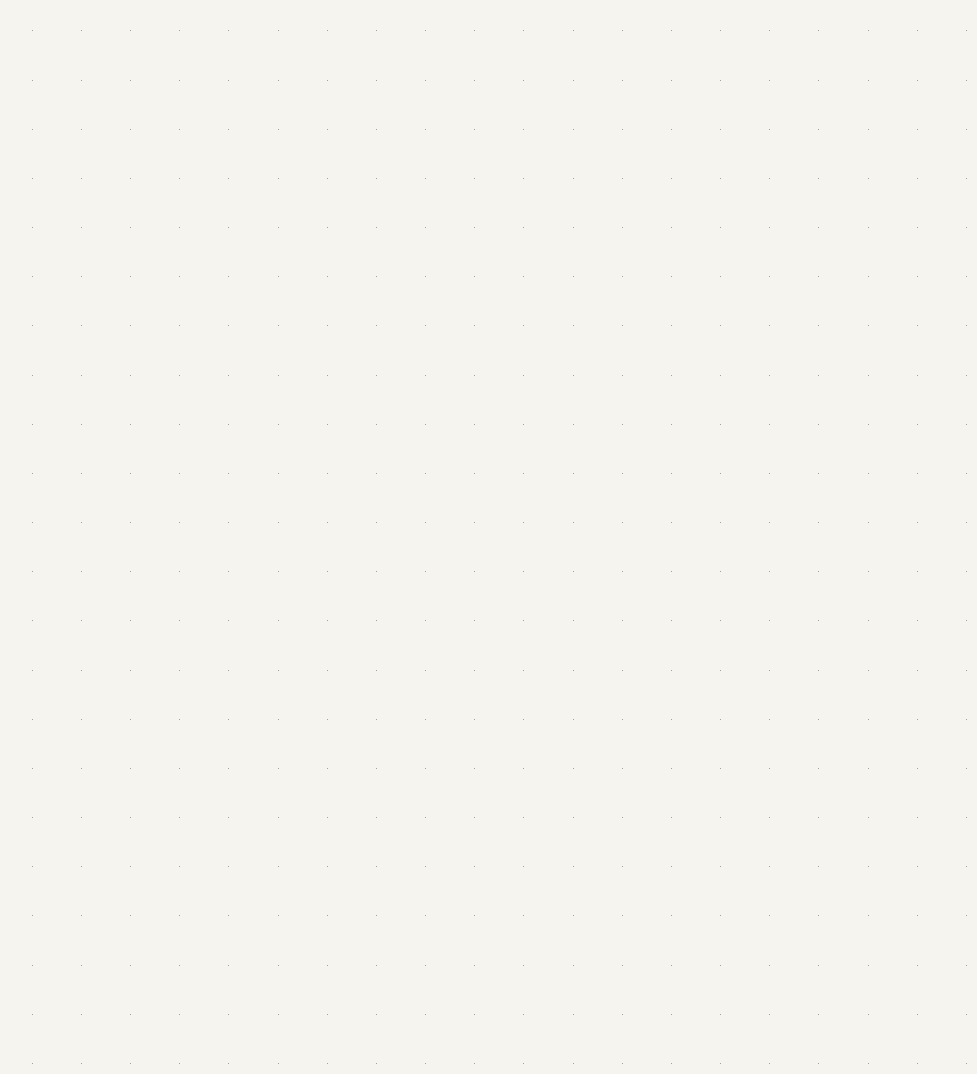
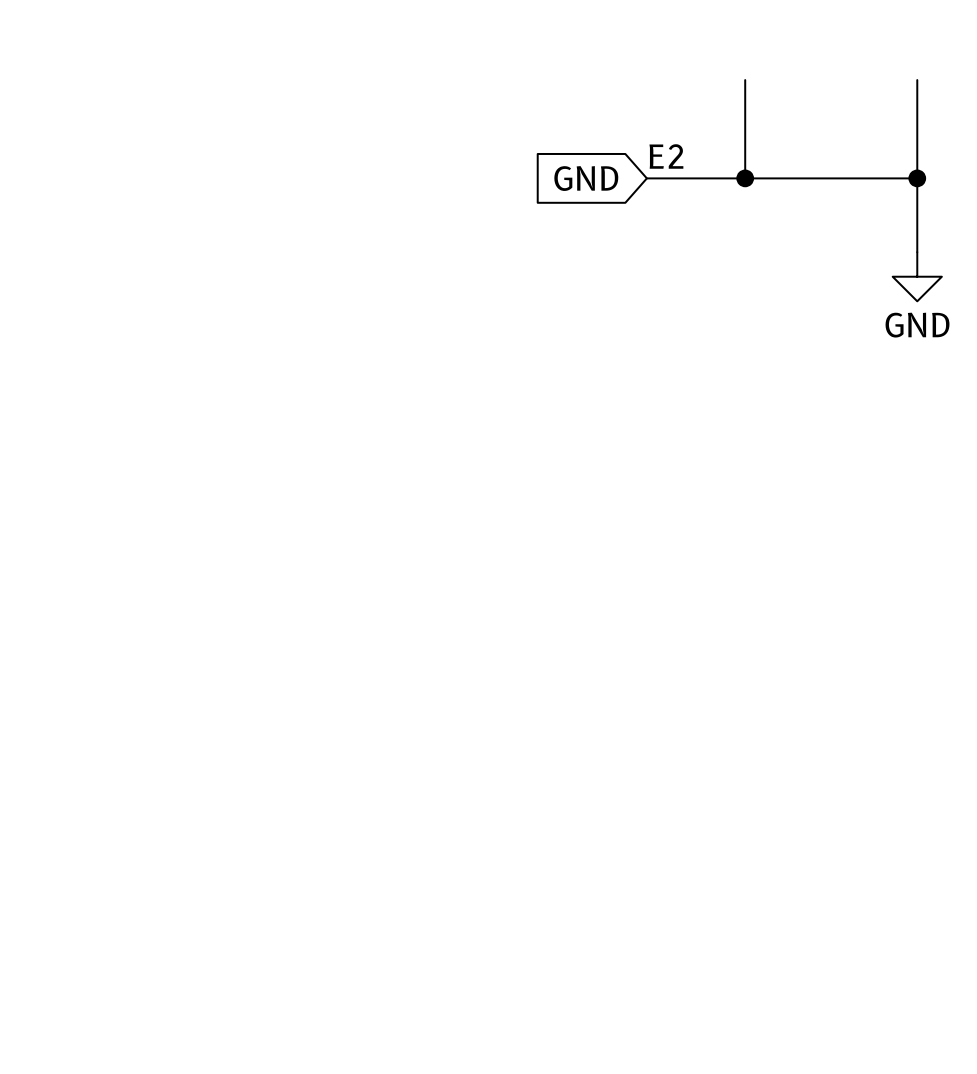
wire: none -> (745, 80) (745, 178)
wire: none -> (917, 80) (917, 252)
label: none -> E2 (666, 156)
global label: none -> GND (586, 178)
wire: none -> (646, 178) (917, 178)
junction: none -> (745, 178)
junction: none -> (917, 178)
power symbol: none -> GND (917, 276)

